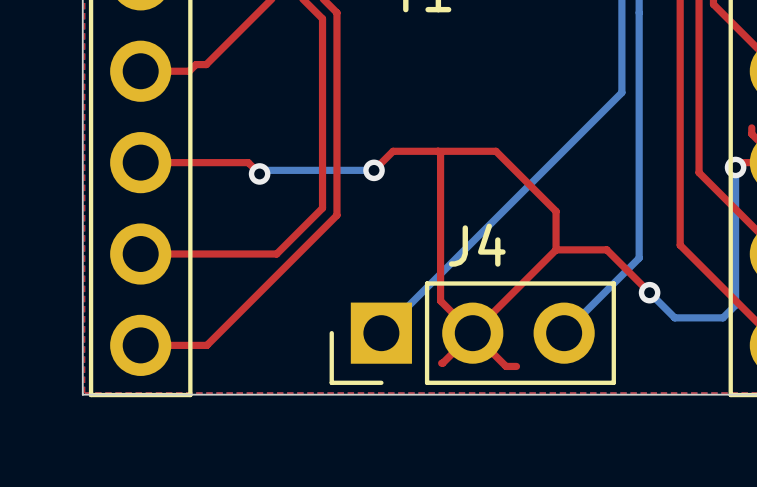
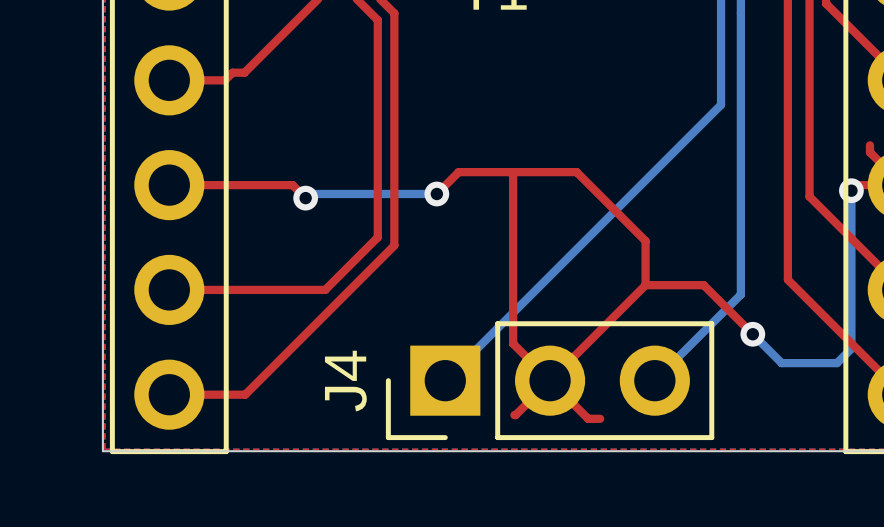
J4 name rotation: 0° (477, 245) -> 90° counterclockwise (345, 381)
J4 name position: J4 (477, 245) -> J4 (345, 381)

